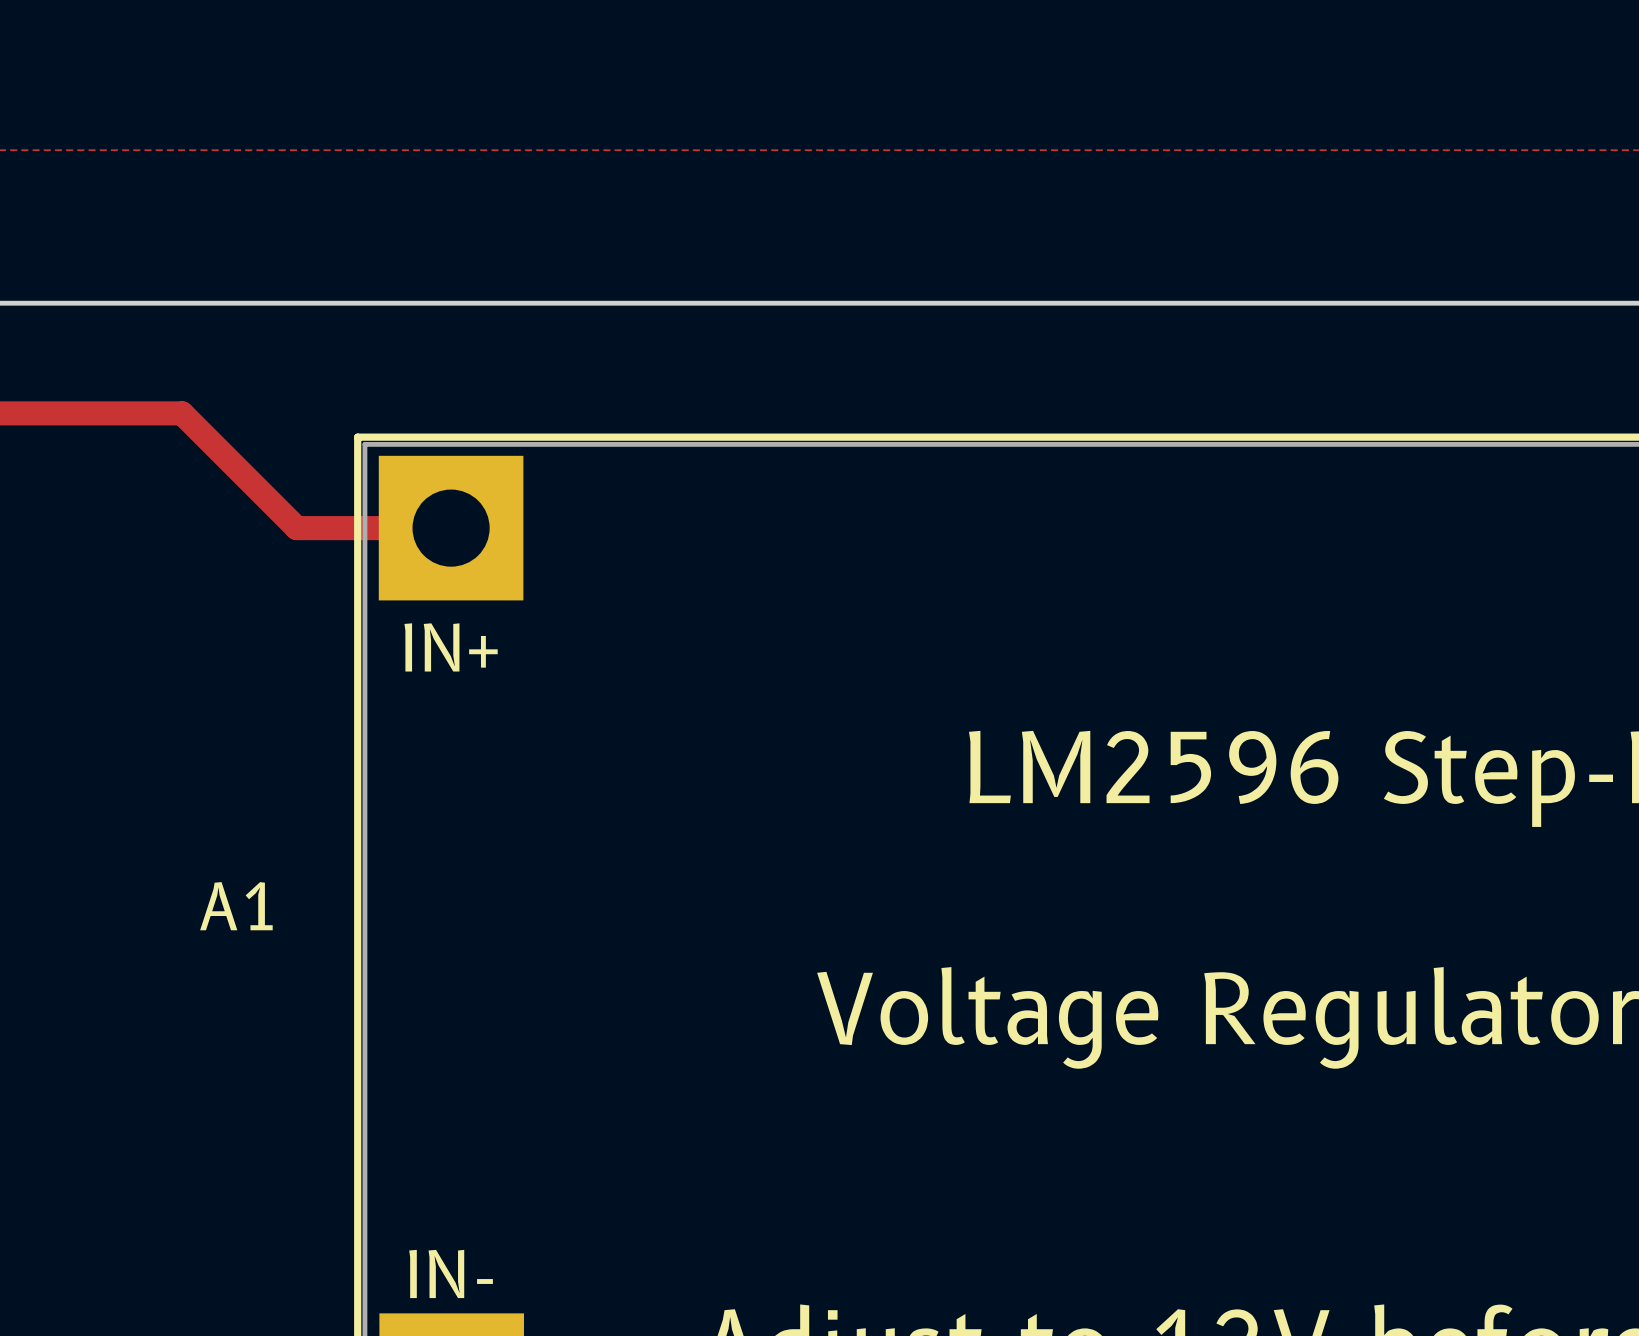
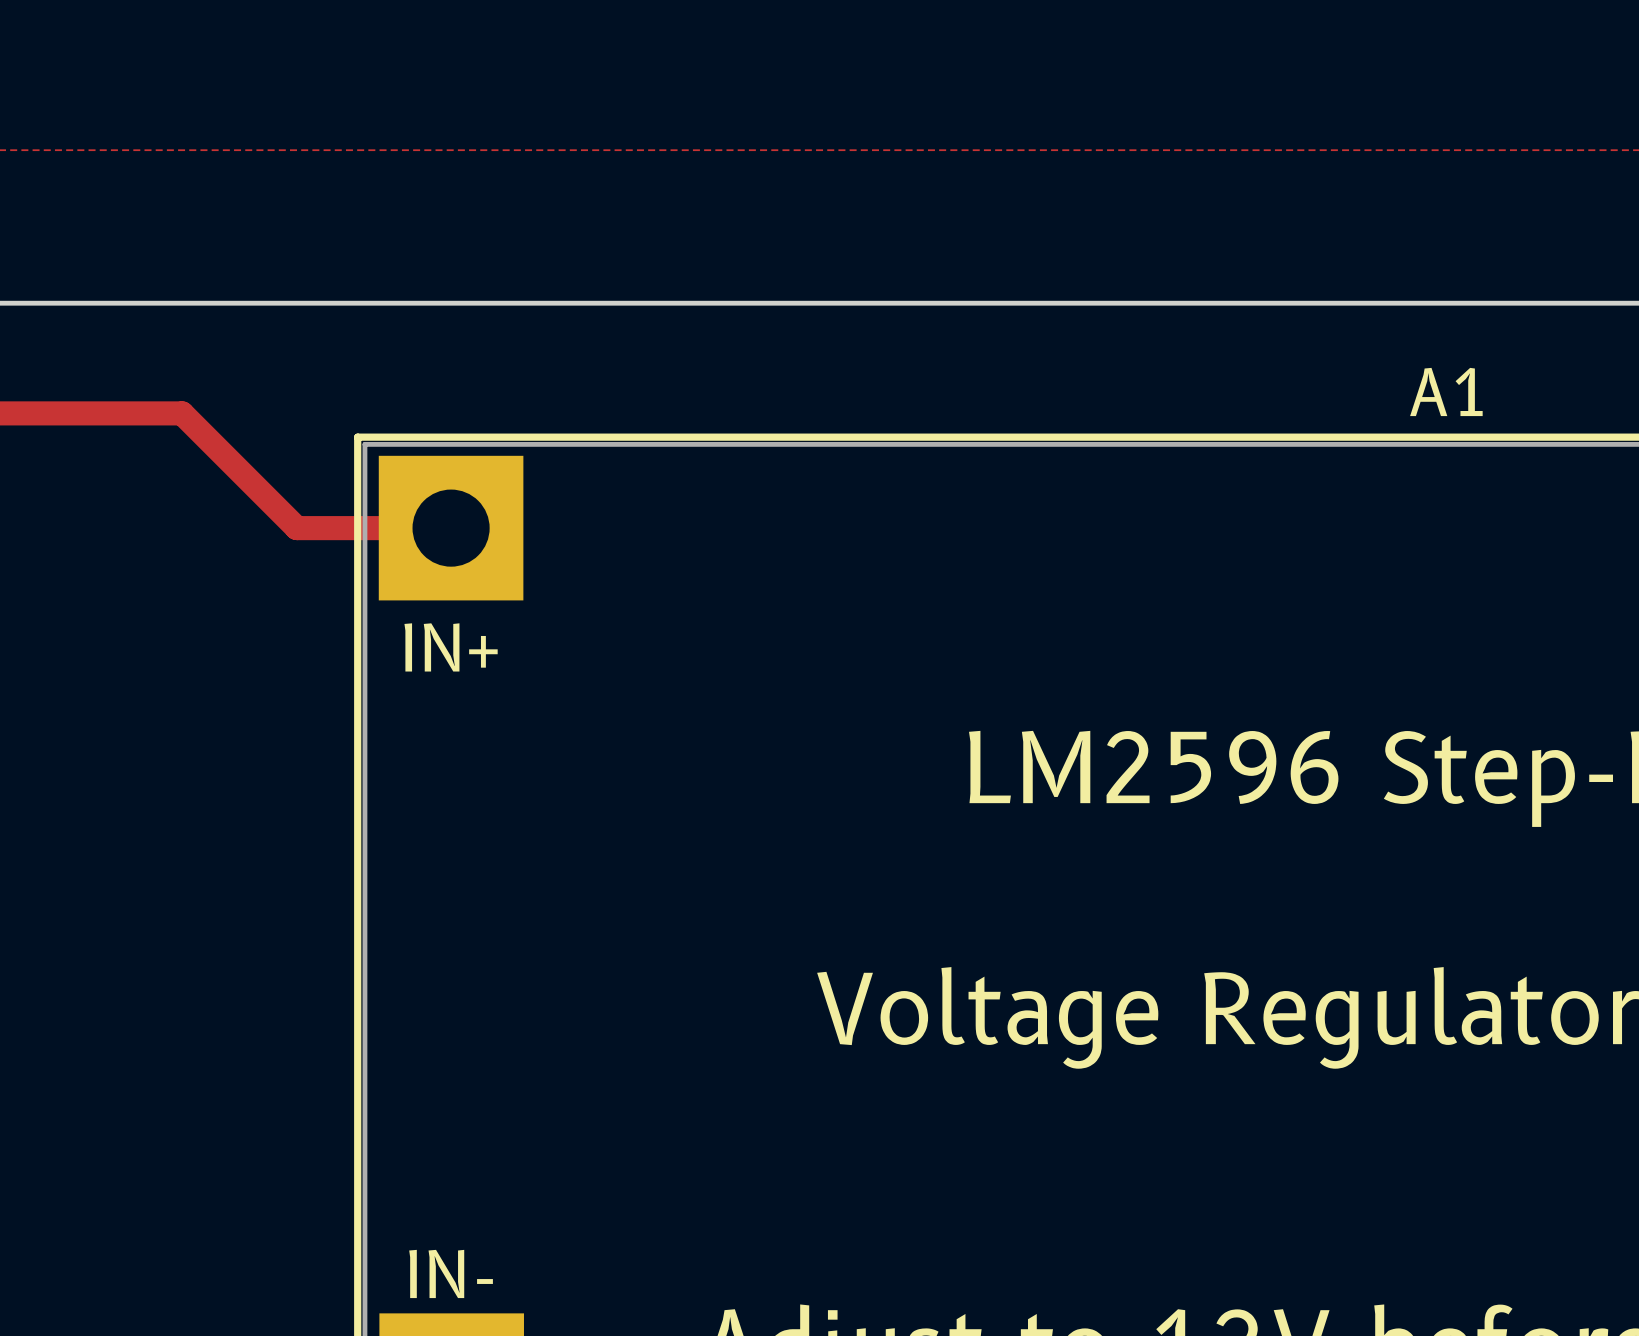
A1 name position: A1 (236, 906) -> A1 (1446, 391)

